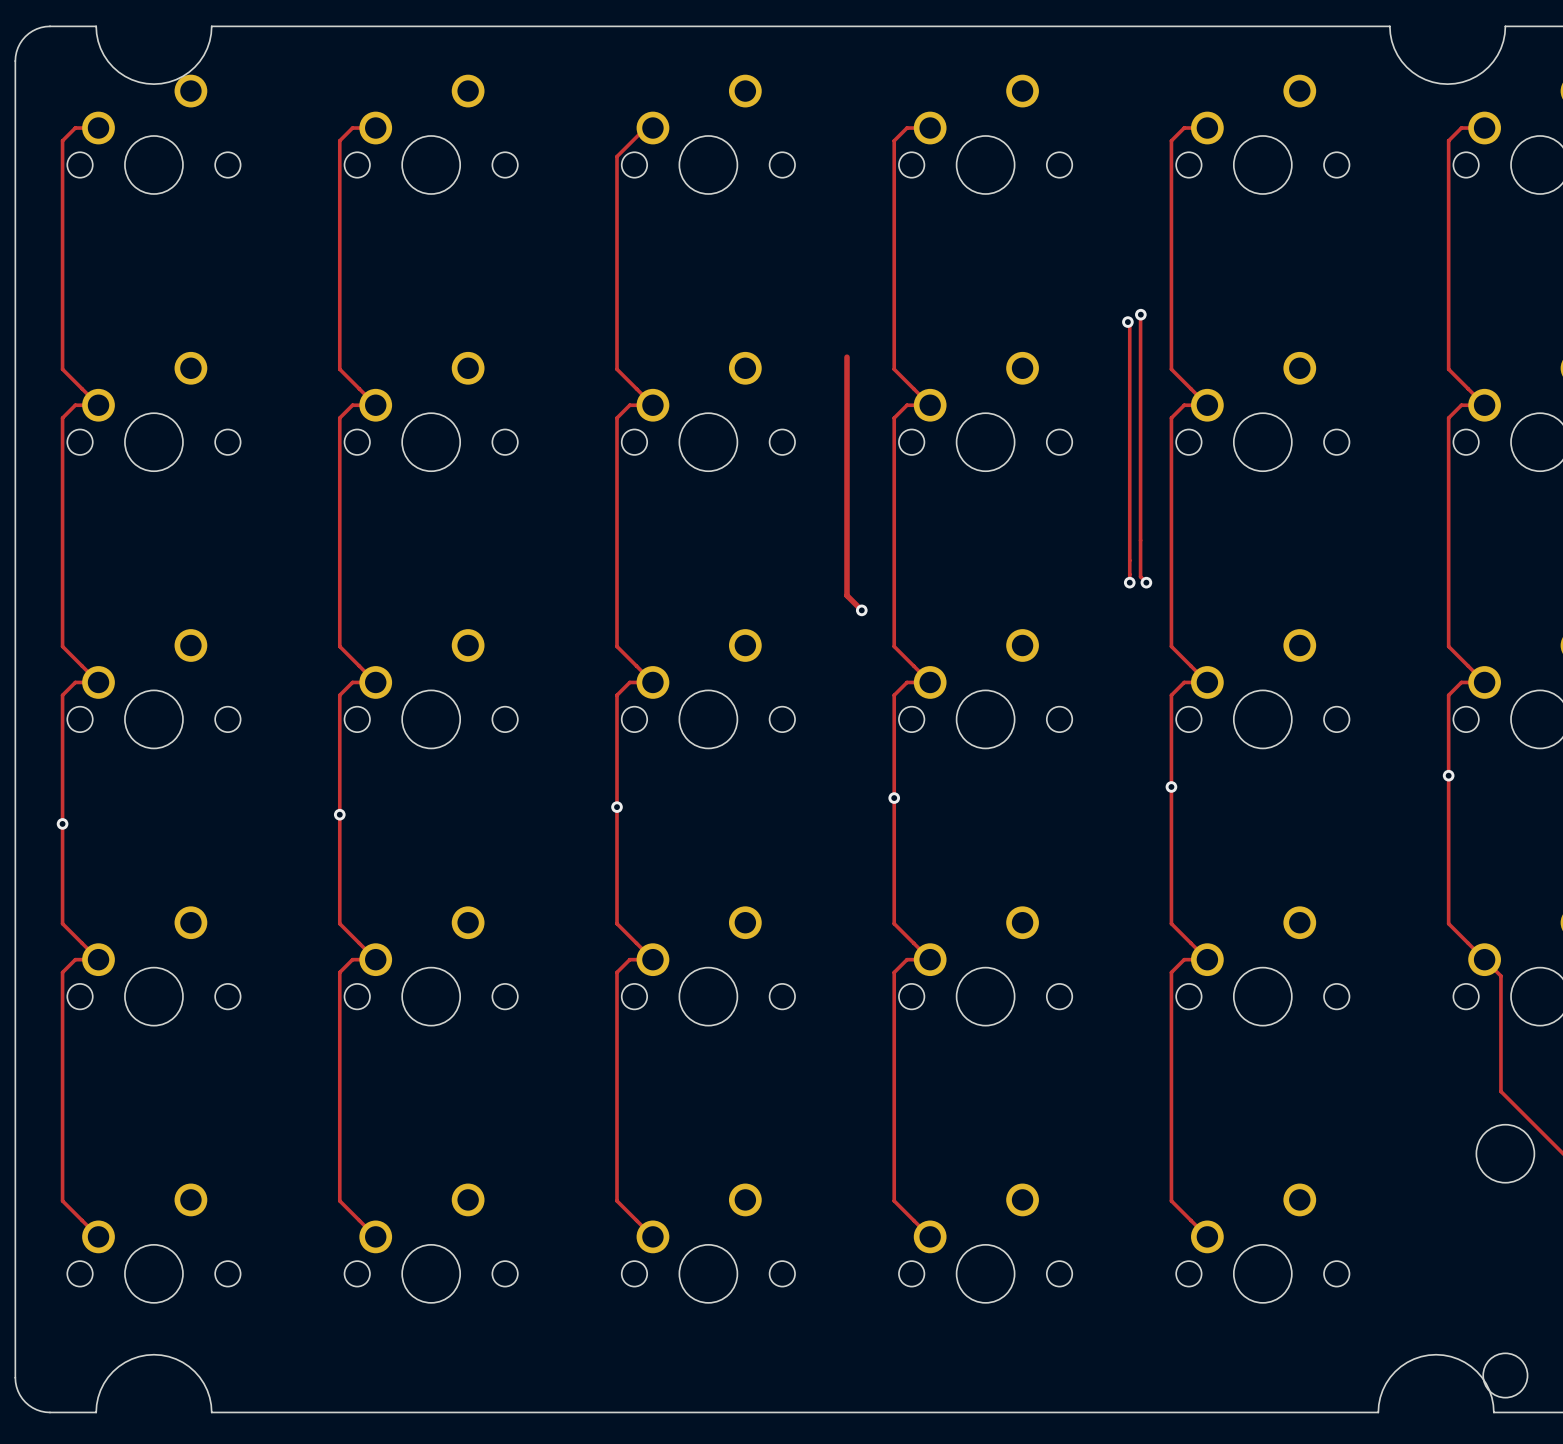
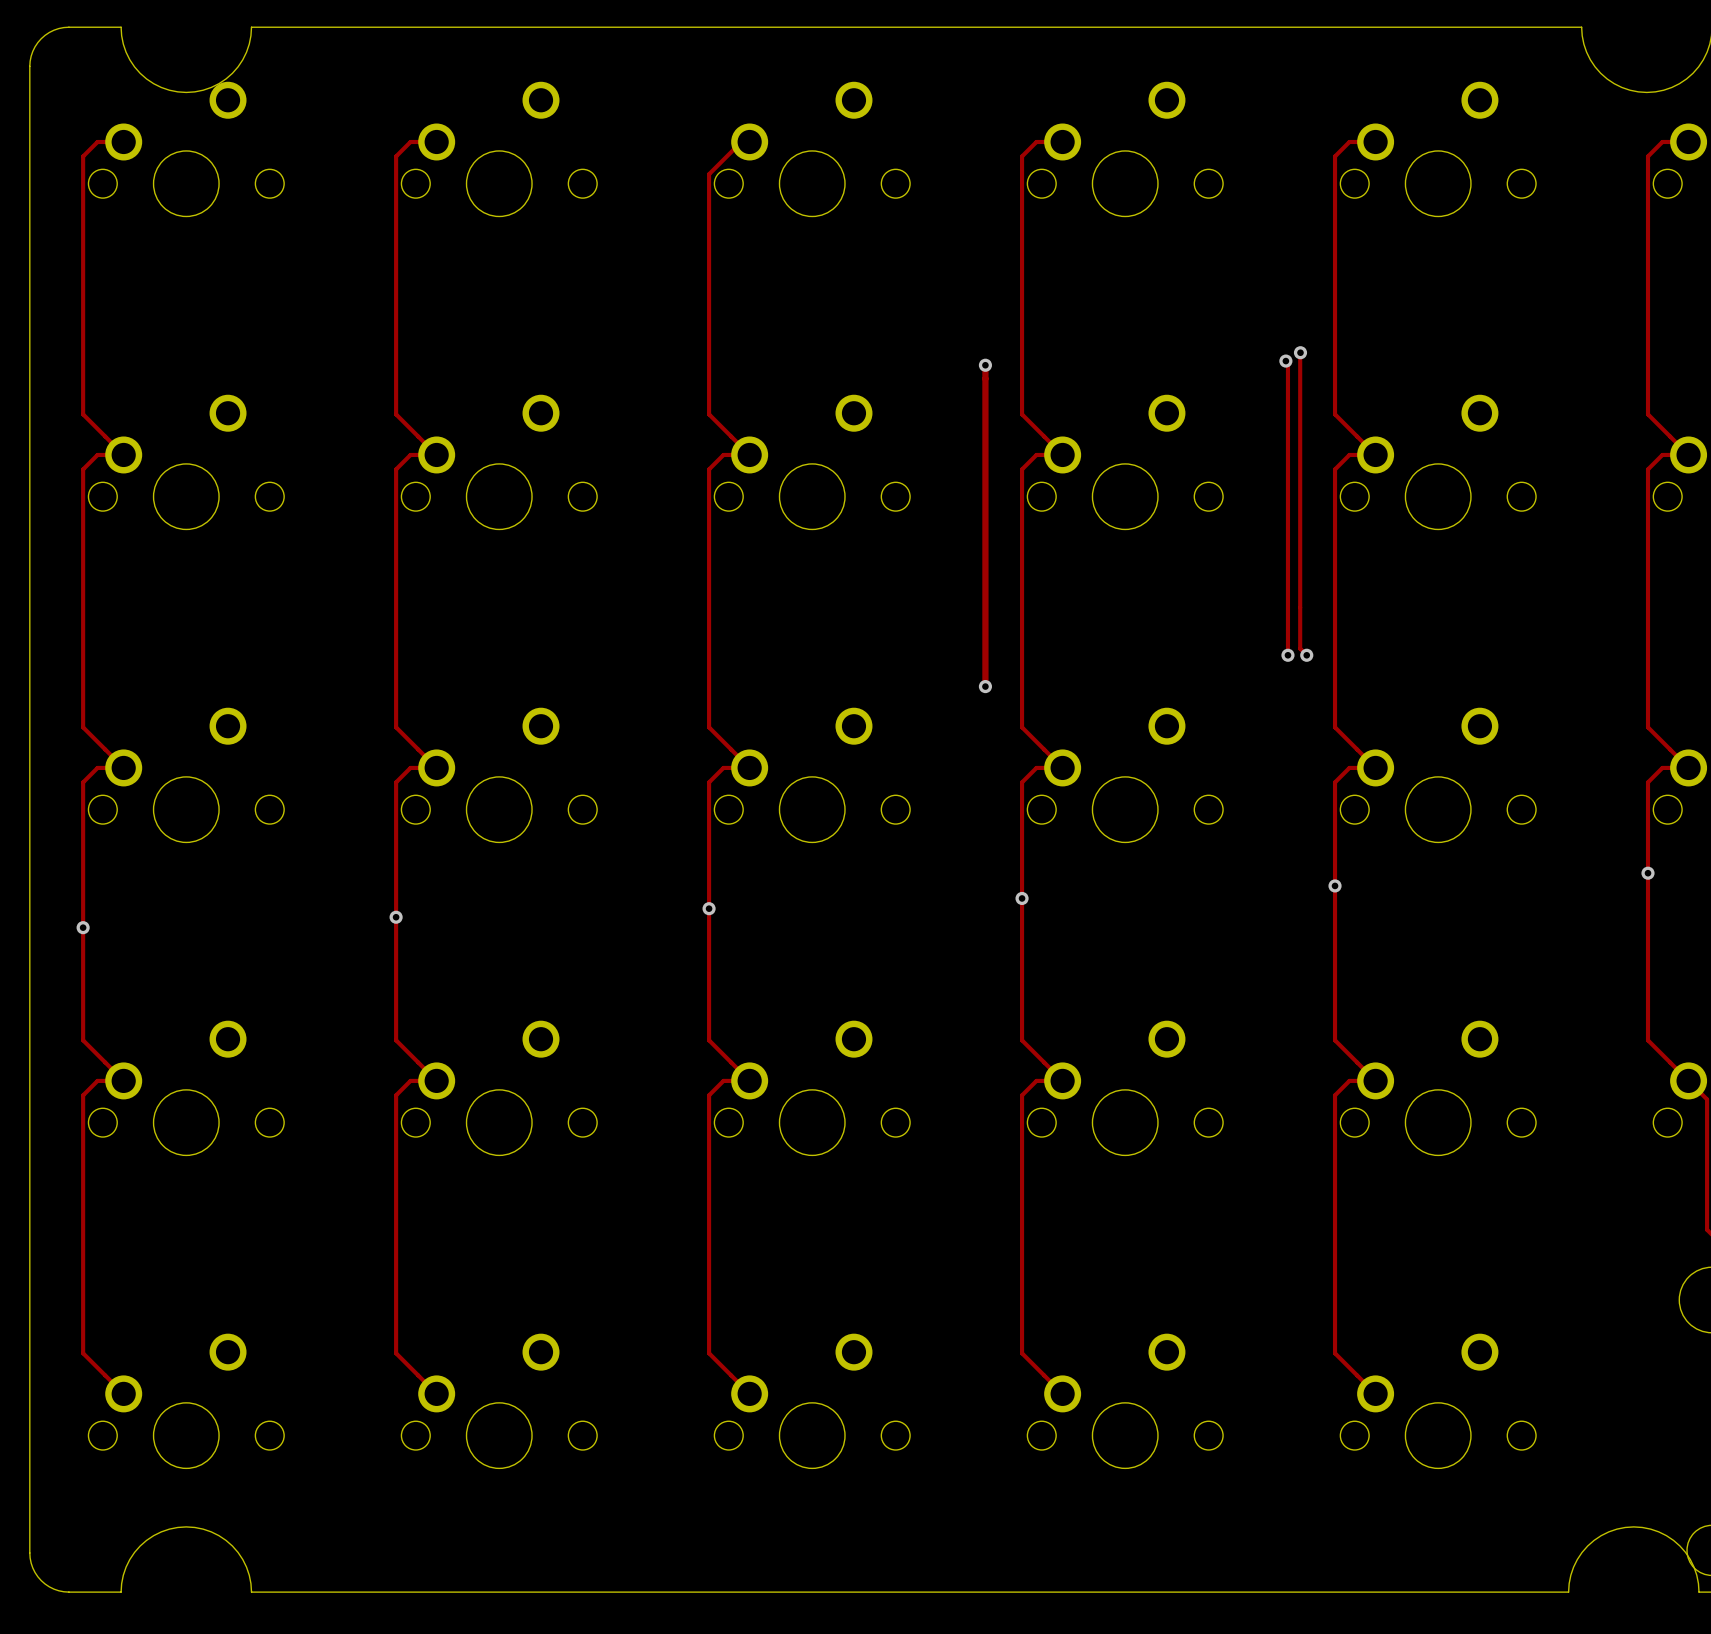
via: none -> (985, 365)
track: (847, 357) (847, 595) (861, 610) -> (985, 365) (985, 686)

